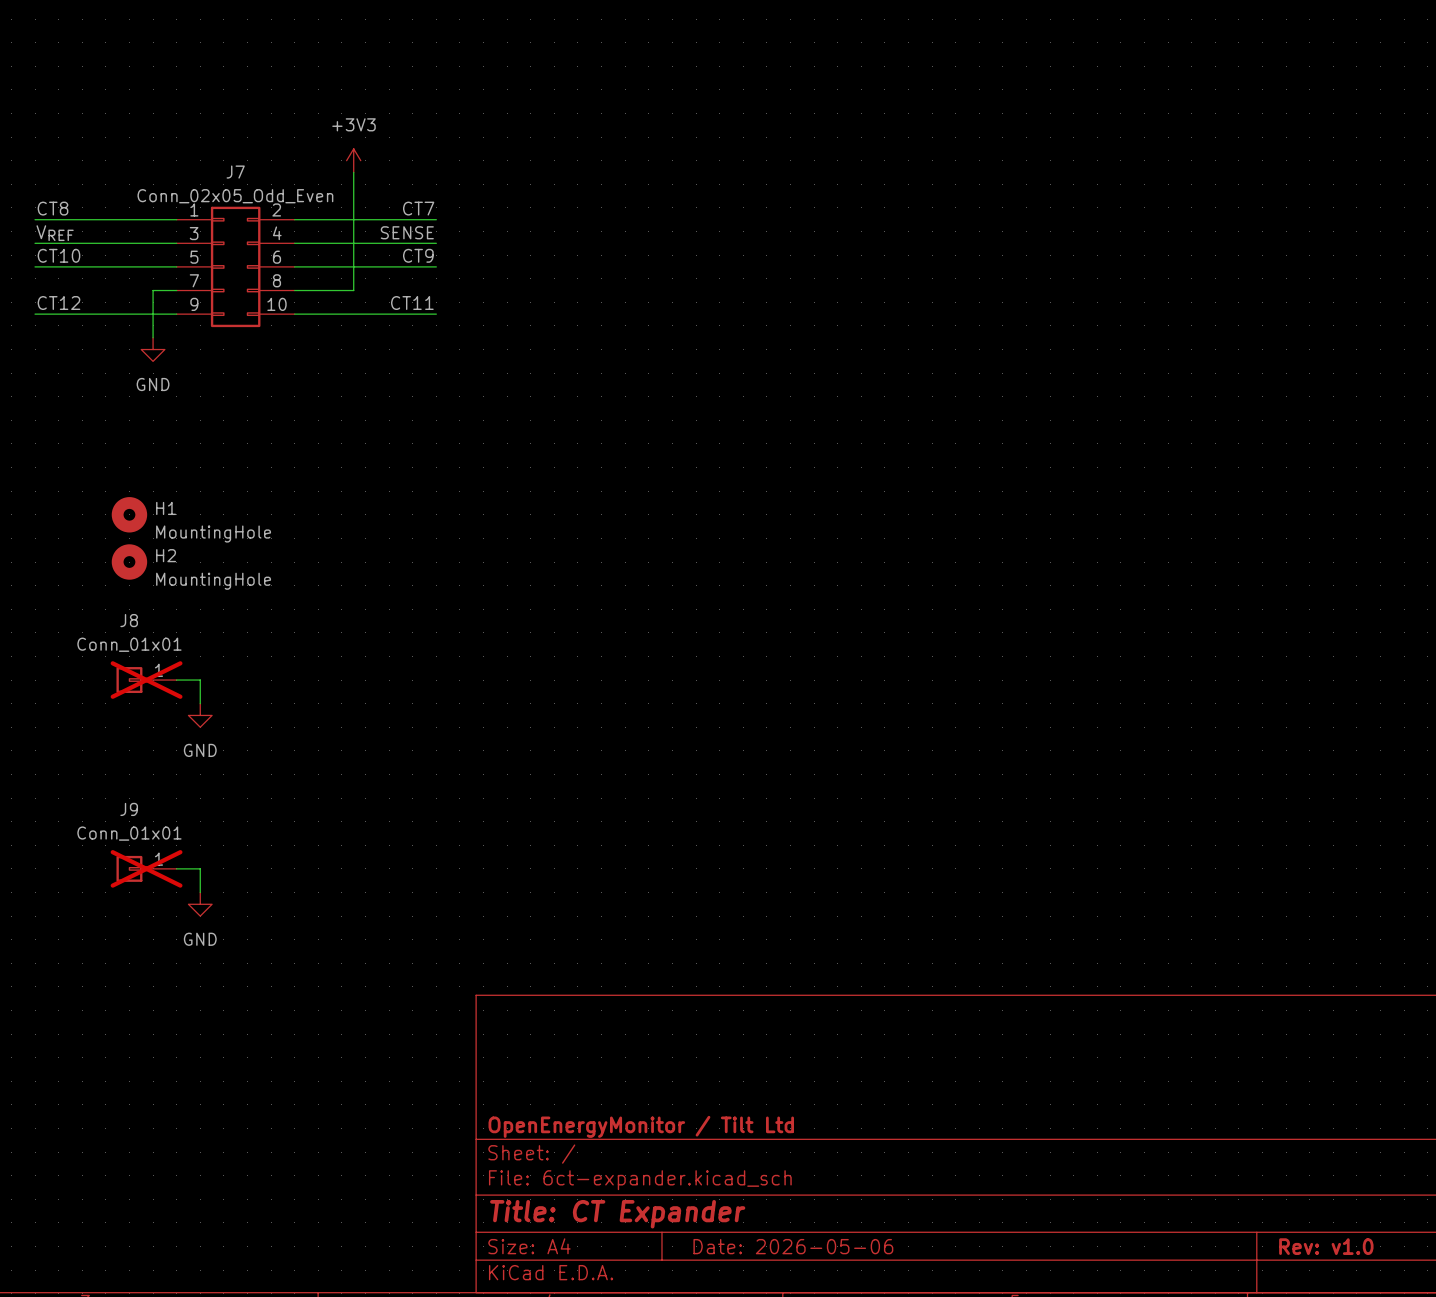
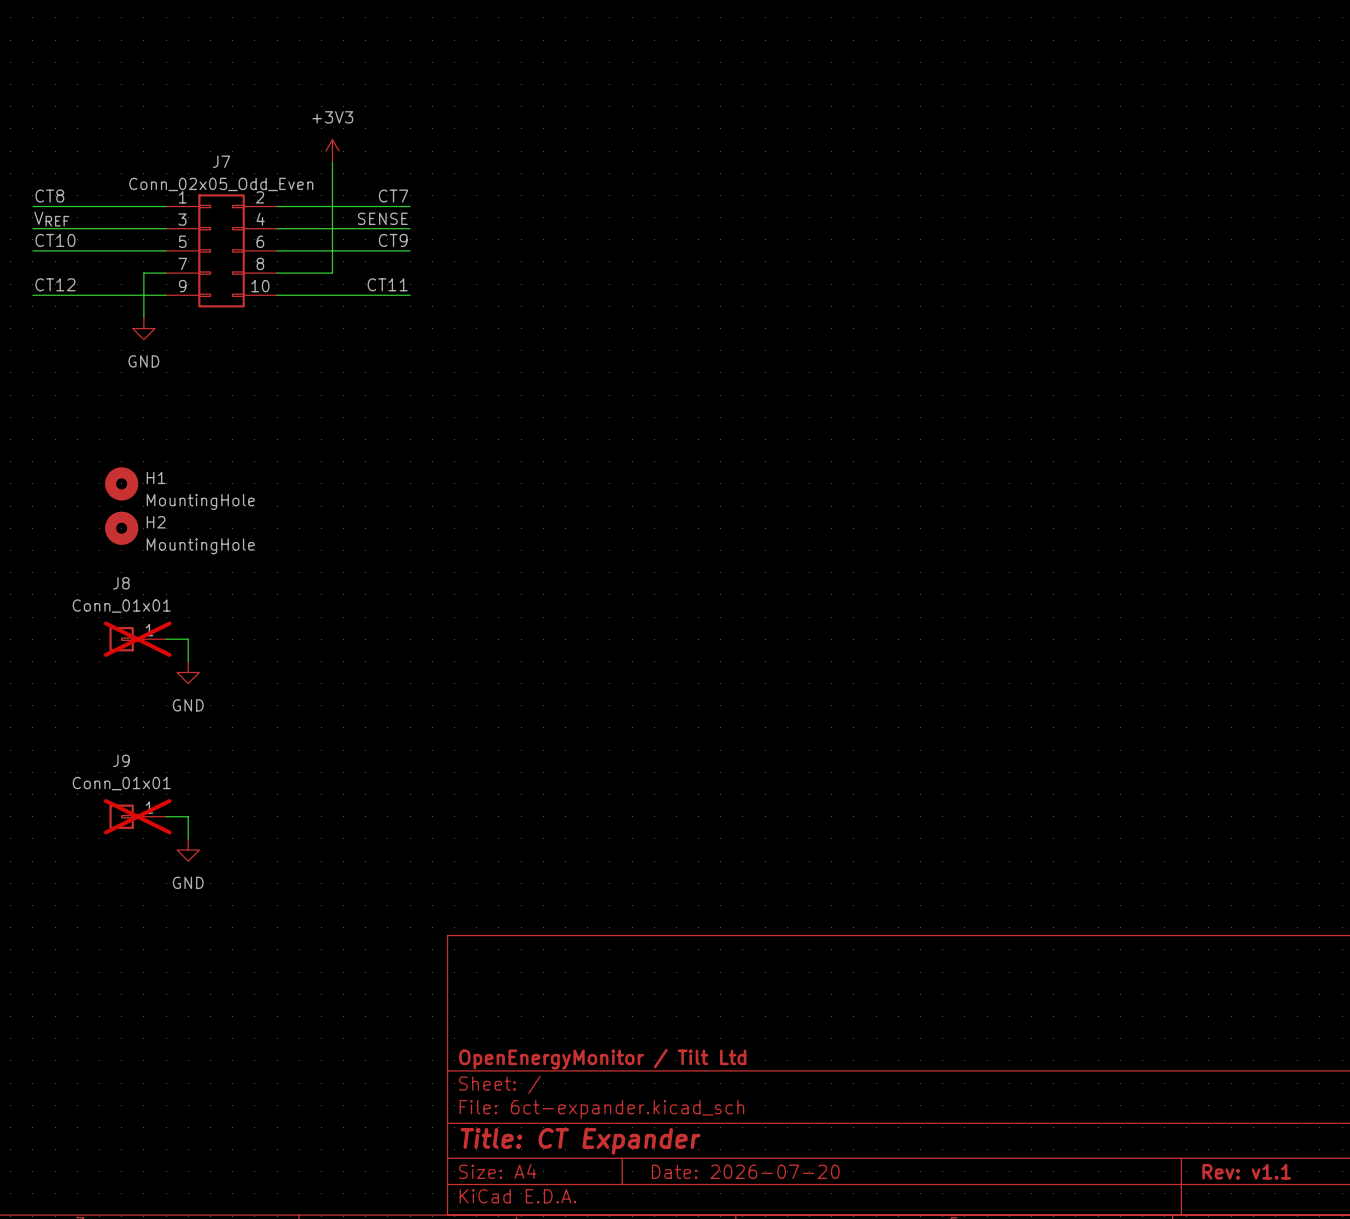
title block: Date: 2026-05-06 (793, 1246) -> Date: 2026-07-20 (745, 1171)
title block: Rev: v1.0 (1326, 1246) -> Rev: v1.1 (1246, 1171)

